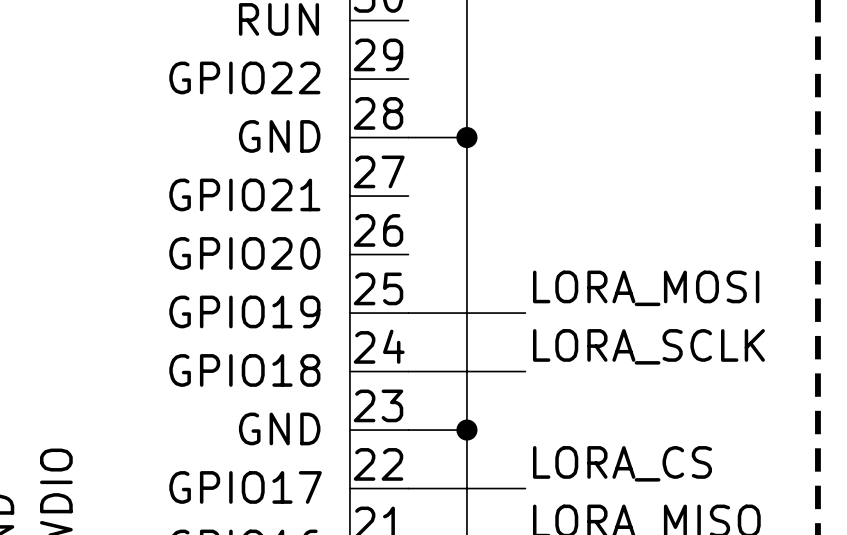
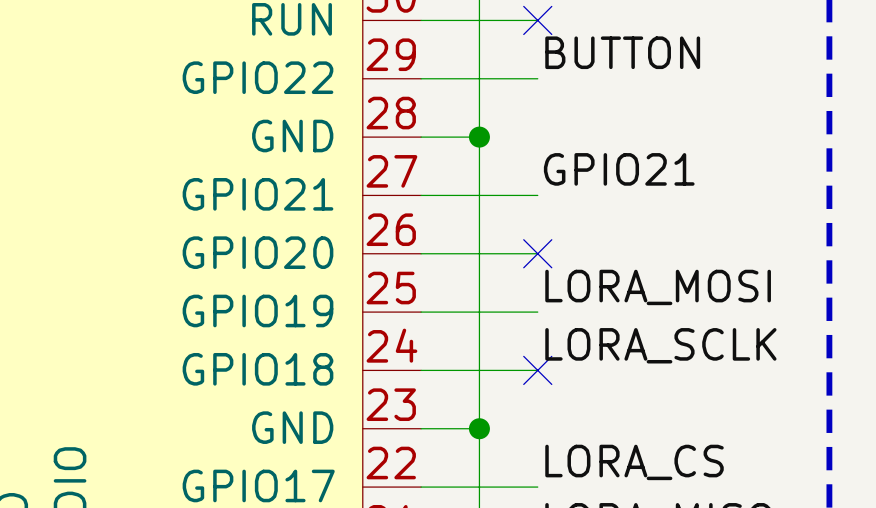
wire: none -> (421, 20) (537, 20)
no-connect mark: none -> (537, 20)
label: none -> BUTTON (622, 52)
wire: none -> (421, 78) (537, 78)
label: none -> GPIO21 (619, 169)
wire: none -> (421, 195) (537, 195)
wire: none -> (421, 253) (537, 253)
no-connect mark: none -> (537, 253)
no-connect mark: none -> (537, 370)

